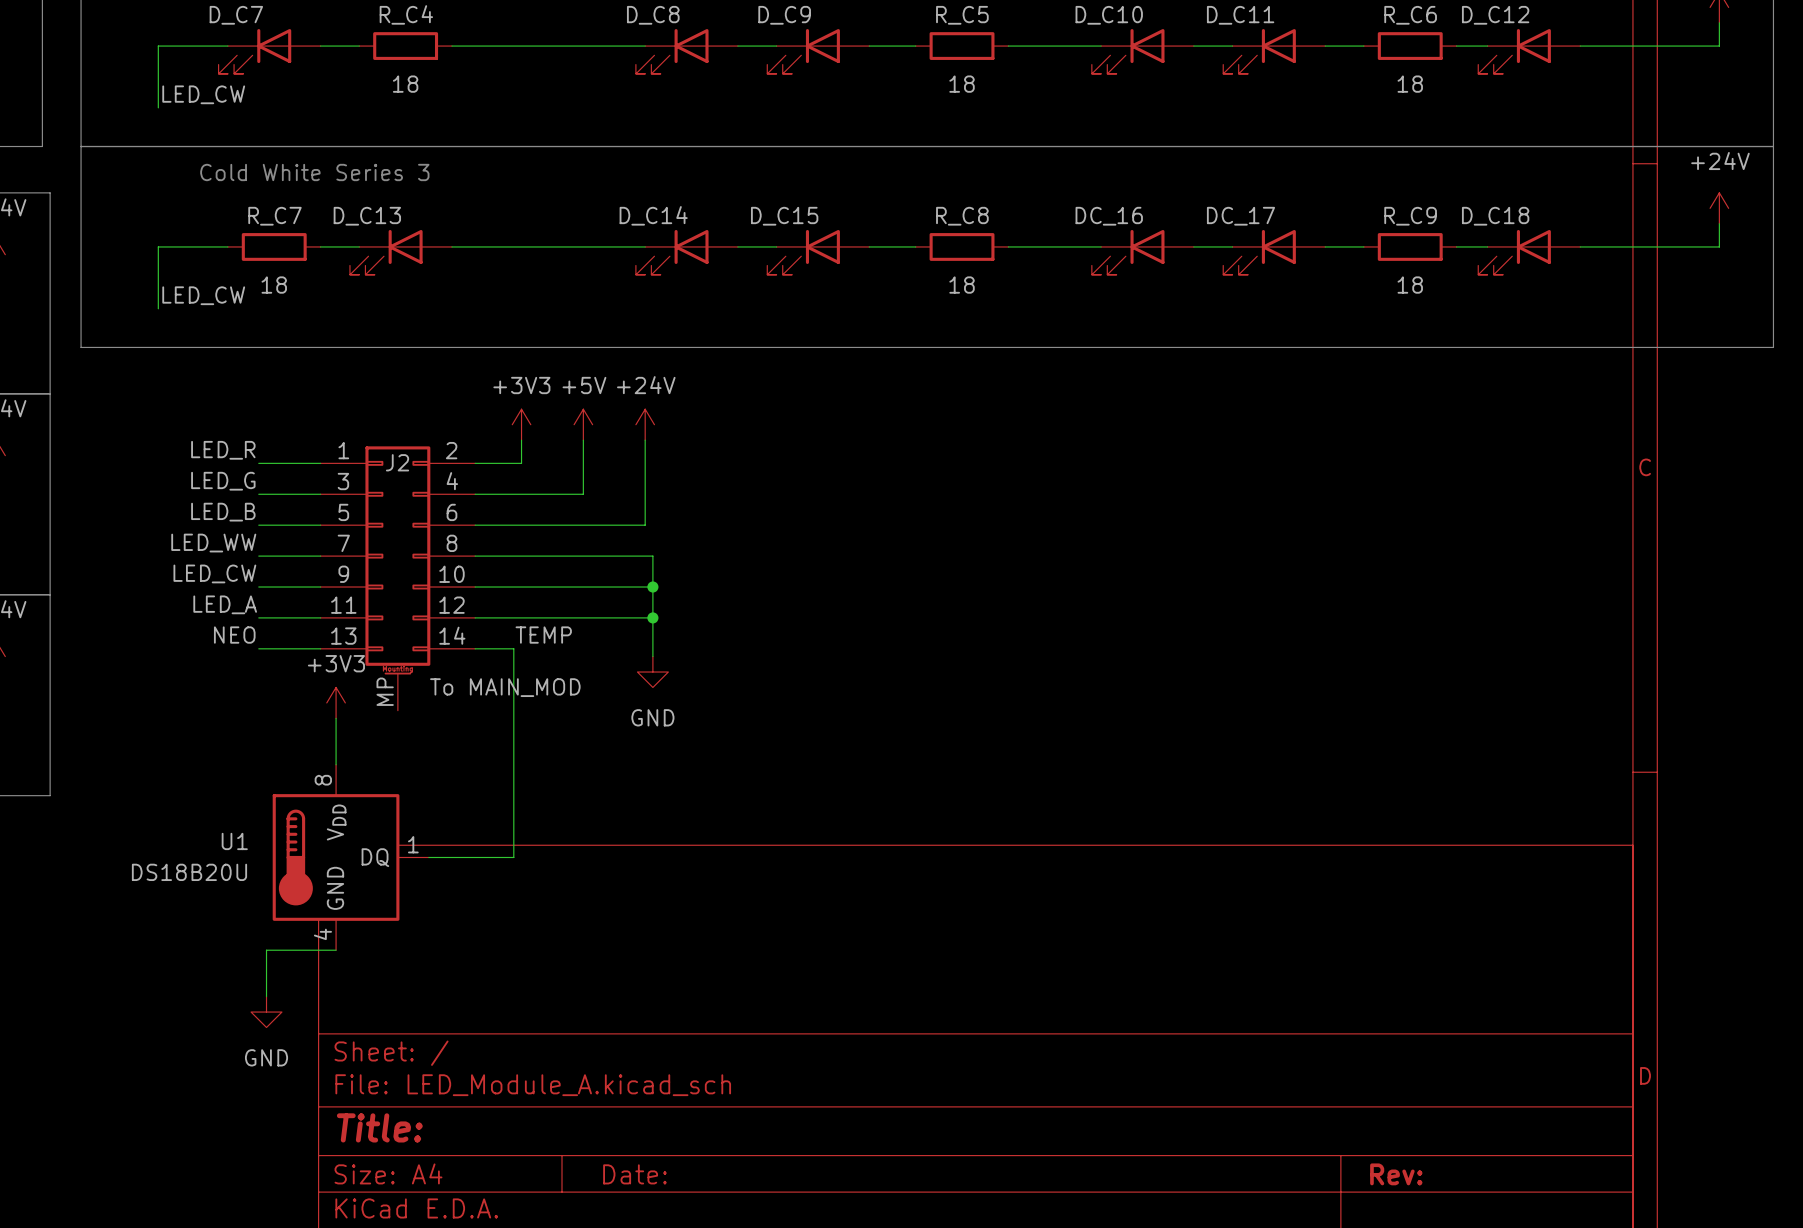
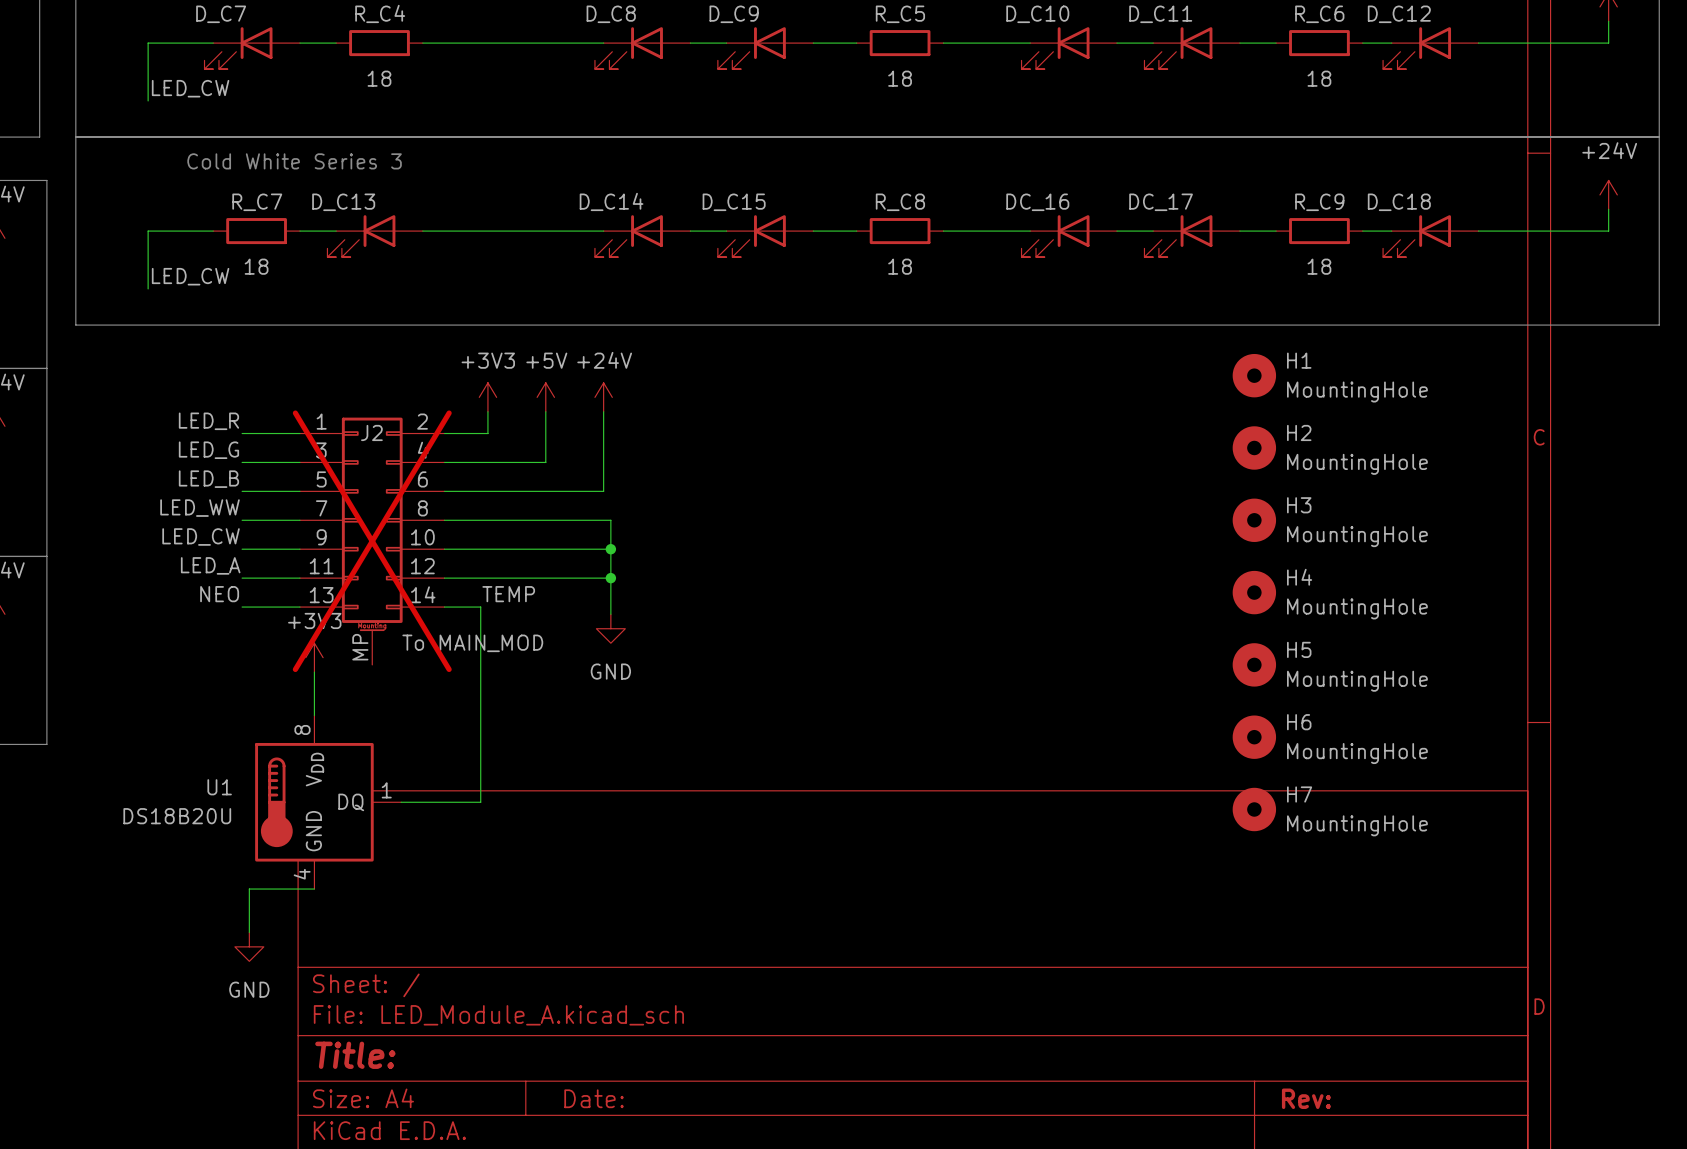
H1: none -> MountingHole (1254, 375)
H2: none -> MountingHole (1254, 447)
H3: none -> MountingHole (1254, 520)
J2 do-not-place cross: none -> (372, 541)
H4: none -> MountingHole (1254, 592)
H5: none -> MountingHole (1254, 664)
H6: none -> MountingHole (1254, 737)
H7: none -> MountingHole (1254, 809)

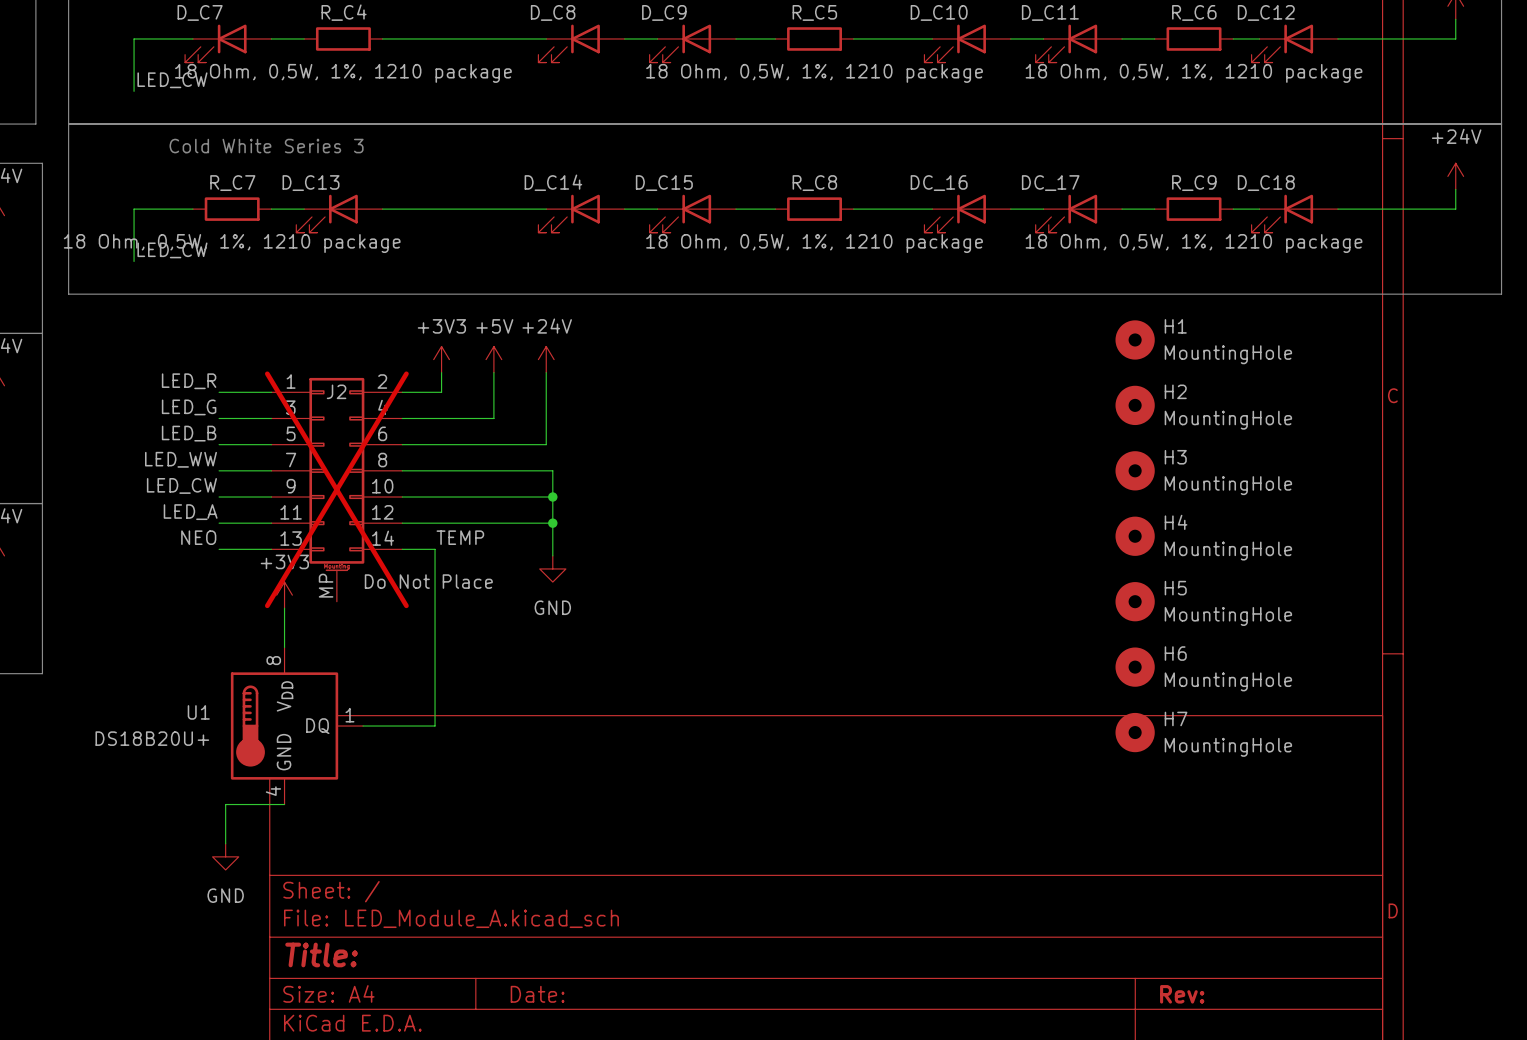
R_C4 value: 18 (379, 78) -> 18 Ohm, 0,5W, 1%, 1210 package (343, 73)
R_C5 value: 18 (900, 78) -> 18 Ohm, 0,5W, 1%, 1210 package (814, 73)
R_C6 value: 18 (1319, 78) -> 18 Ohm, 0,5W, 1%, 1210 package (1194, 73)
R_C7 value: 18 (256, 266) -> 18 Ohm, 0,5W, 1%, 1210 package (232, 243)
R_C8 value: 18 (900, 266) -> 18 Ohm, 0,5W, 1%, 1210 package (814, 243)
R_C9 value: 18 (1319, 266) -> 18 Ohm, 0,5W, 1%, 1210 package (1194, 243)
J2 value: To MAIN_MOD (472, 643) -> Do Not Place (428, 581)
U1 value: DS18B20U (177, 816) -> DS18B20U+ (152, 738)

